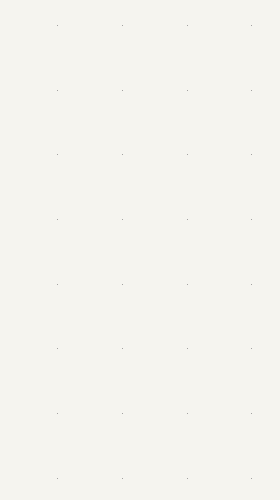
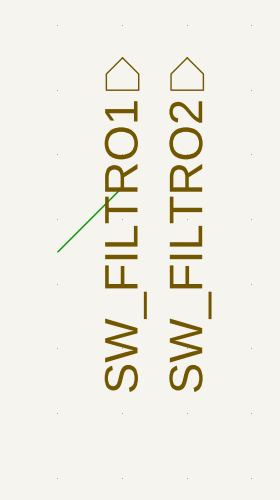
wire: none -> (122, 187) (57, 251)
hierarchical label: none -> SW_FILTRO1 (125, 246)
hierarchical label: none -> SW_FILTRO2 (190, 246)

